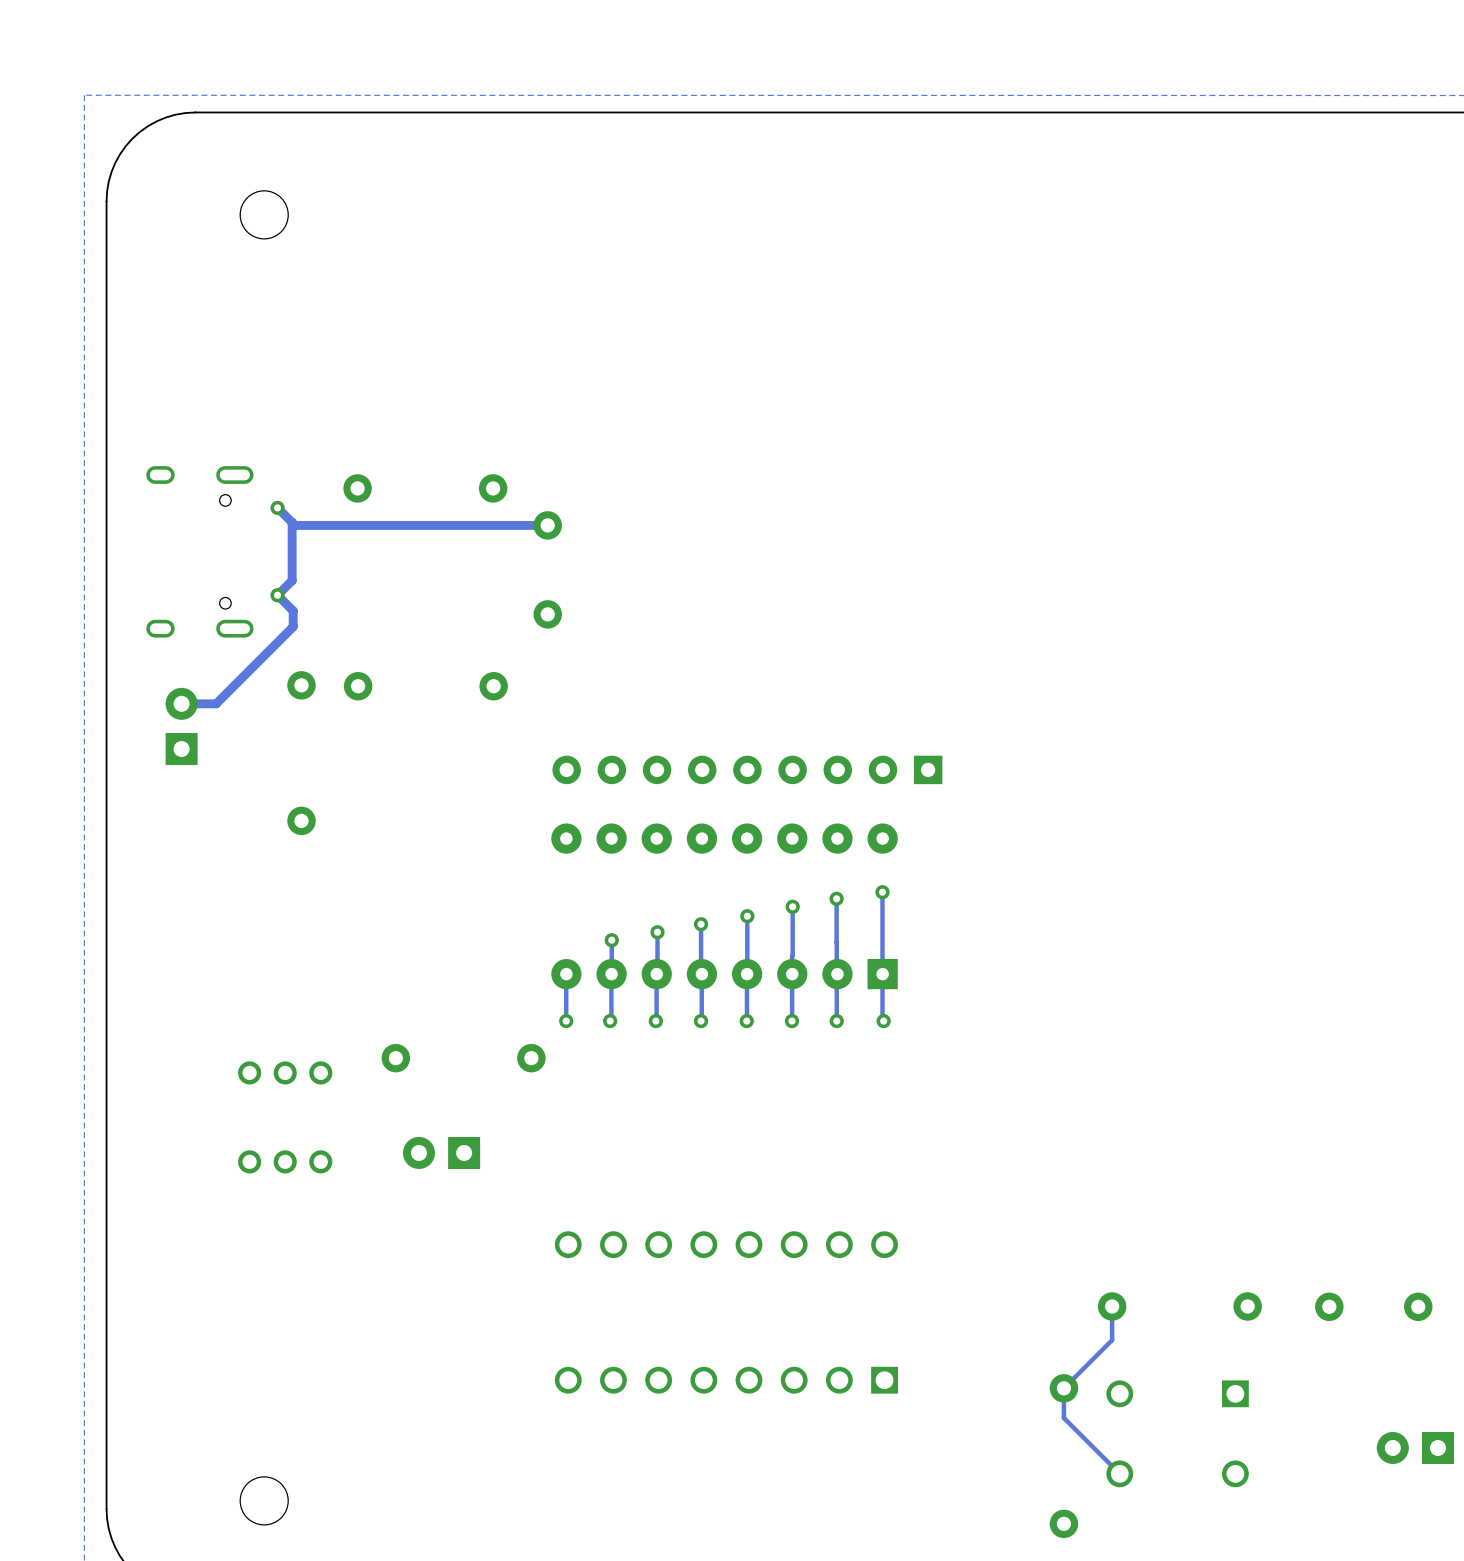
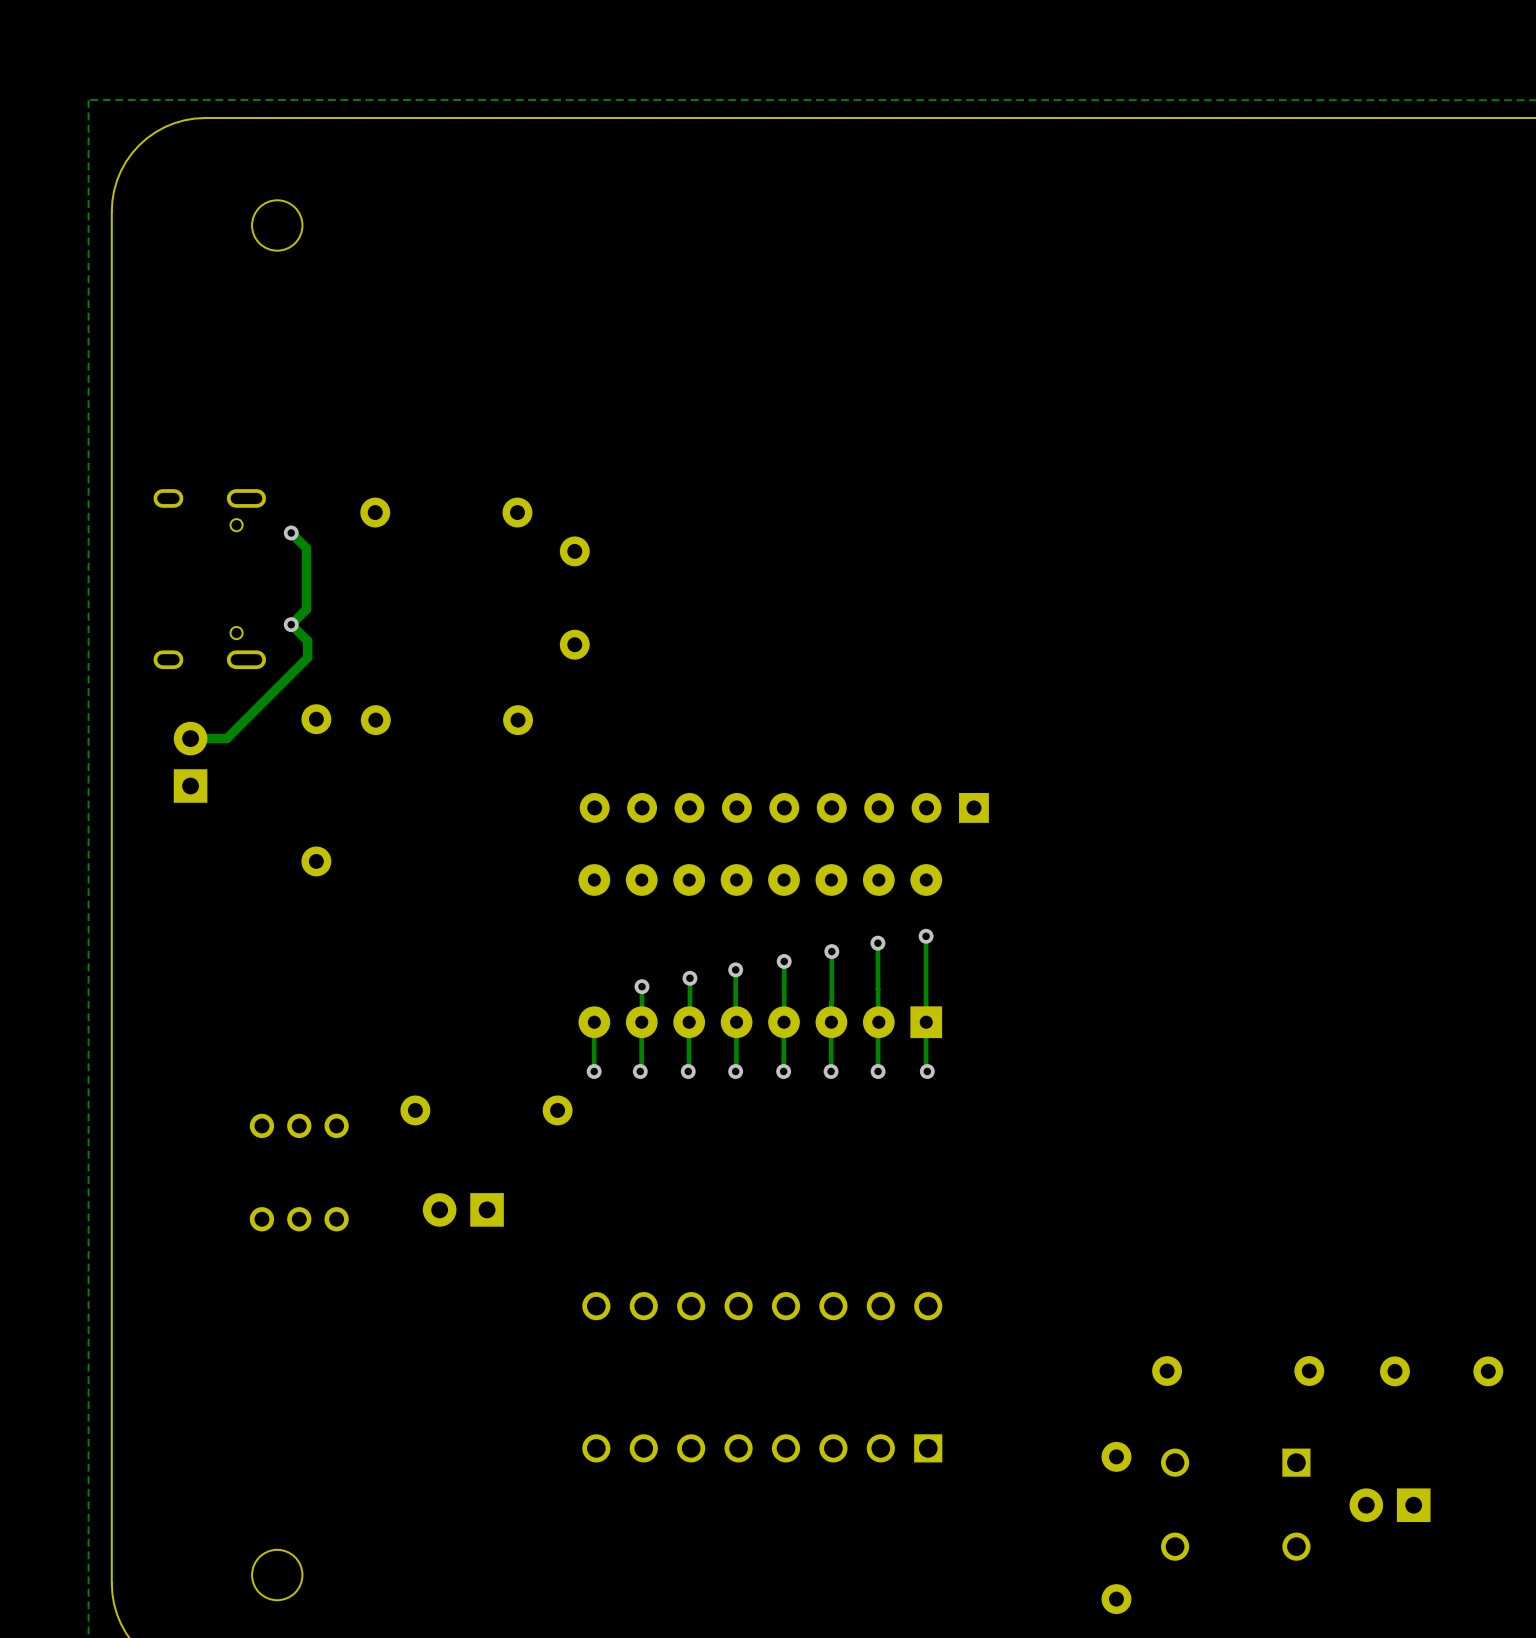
track: (292, 522) (295, 525) (547, 525) -> none
track: (1112, 1306) (1112, 1340) (1063, 1388) (1063, 1418) (1119, 1473) -> none
part position: (1415, 1447) -> (1390, 1505)

